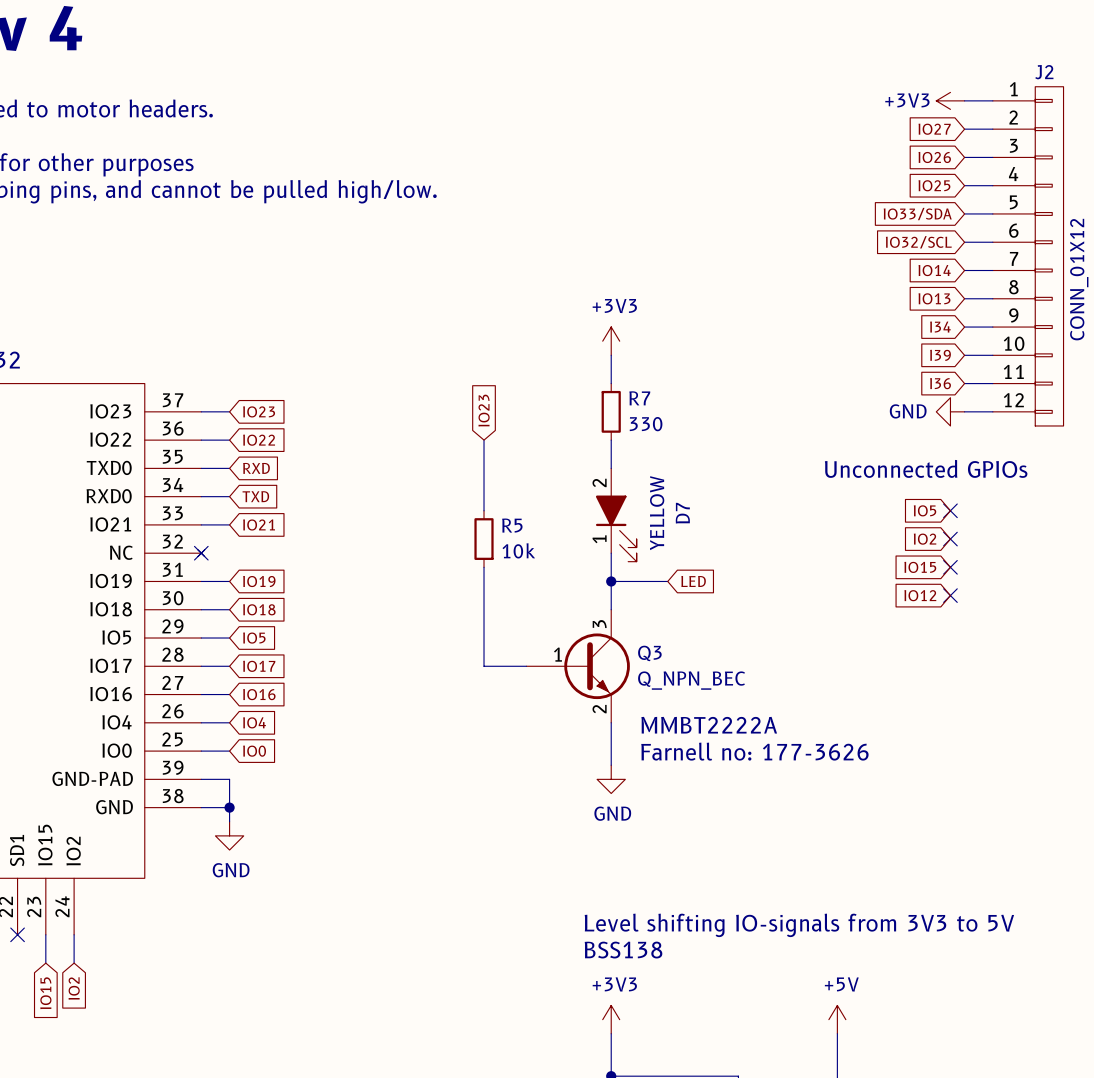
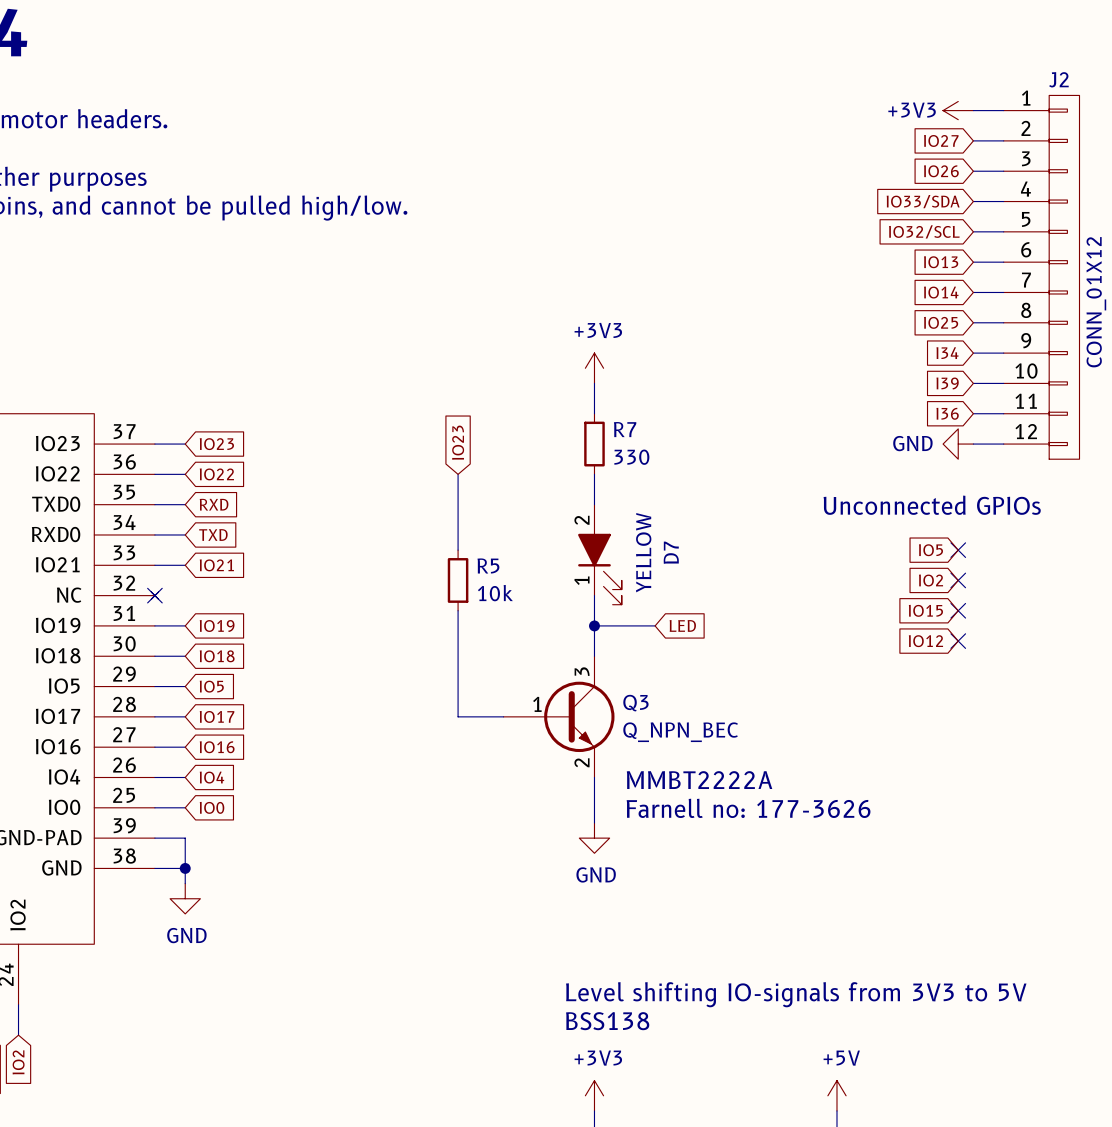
global label: IO25 (934, 185) -> IO33/SDA (923, 201)
global label: IO33/SDA (917, 214) -> IO32/SCL (924, 231)
global label: IO32/SCL (918, 242) -> IO13 (941, 262)
global label: IO13 (934, 298) -> IO25 (941, 322)

